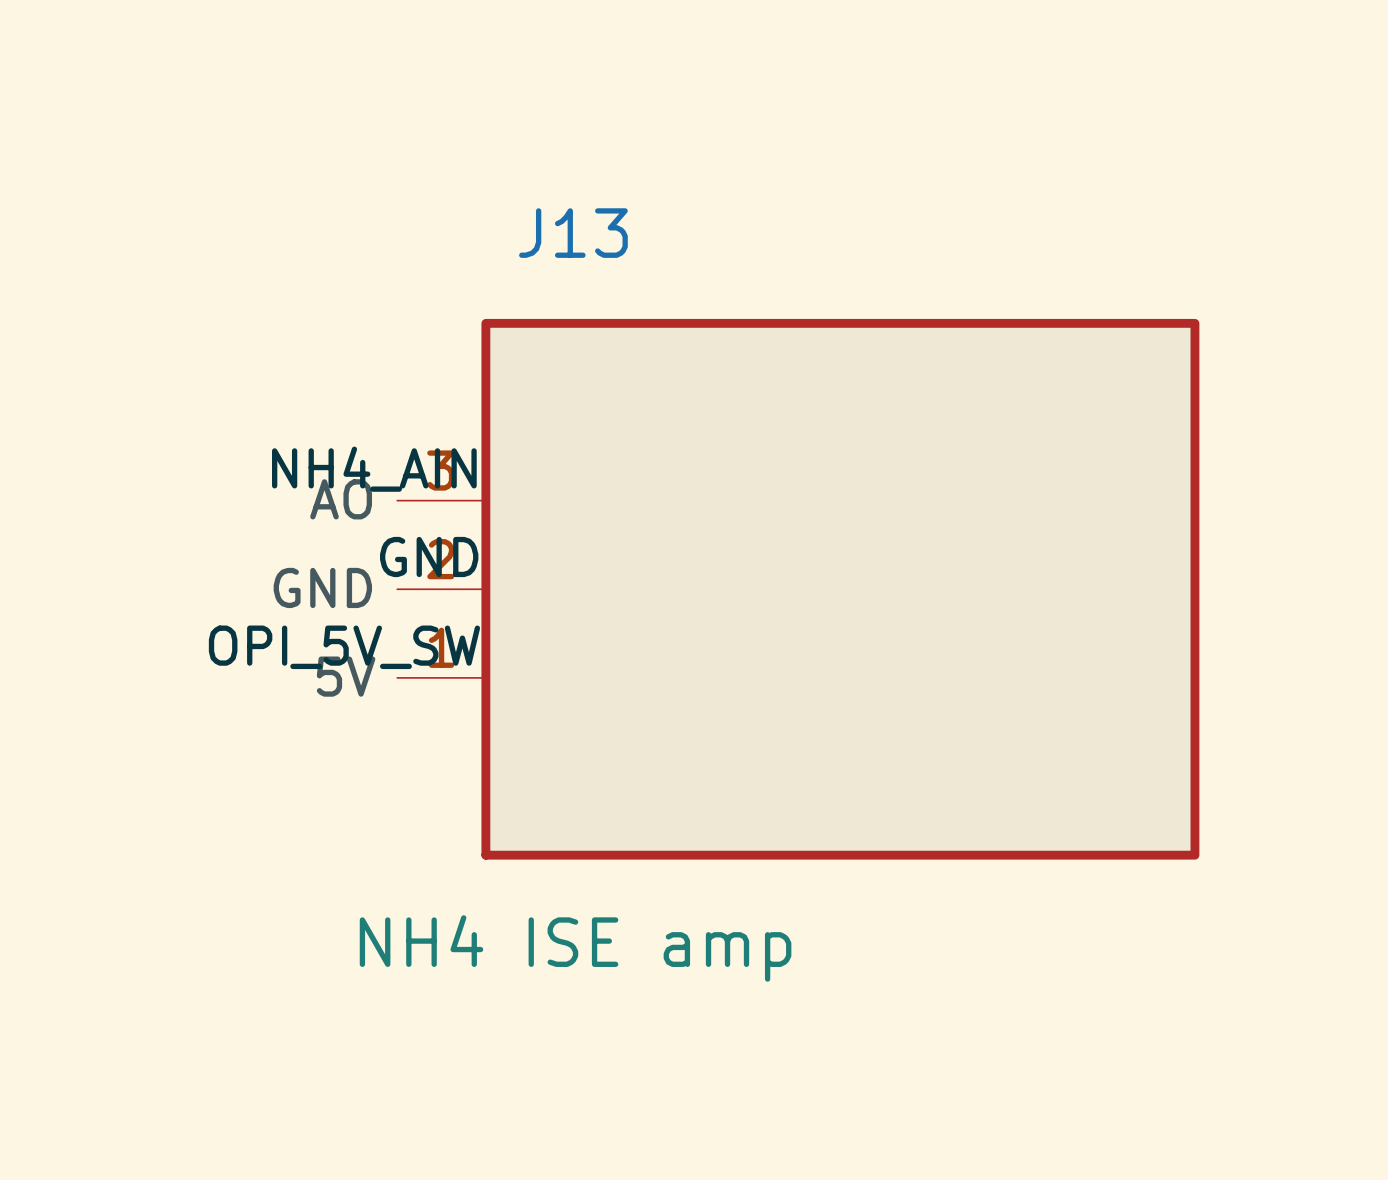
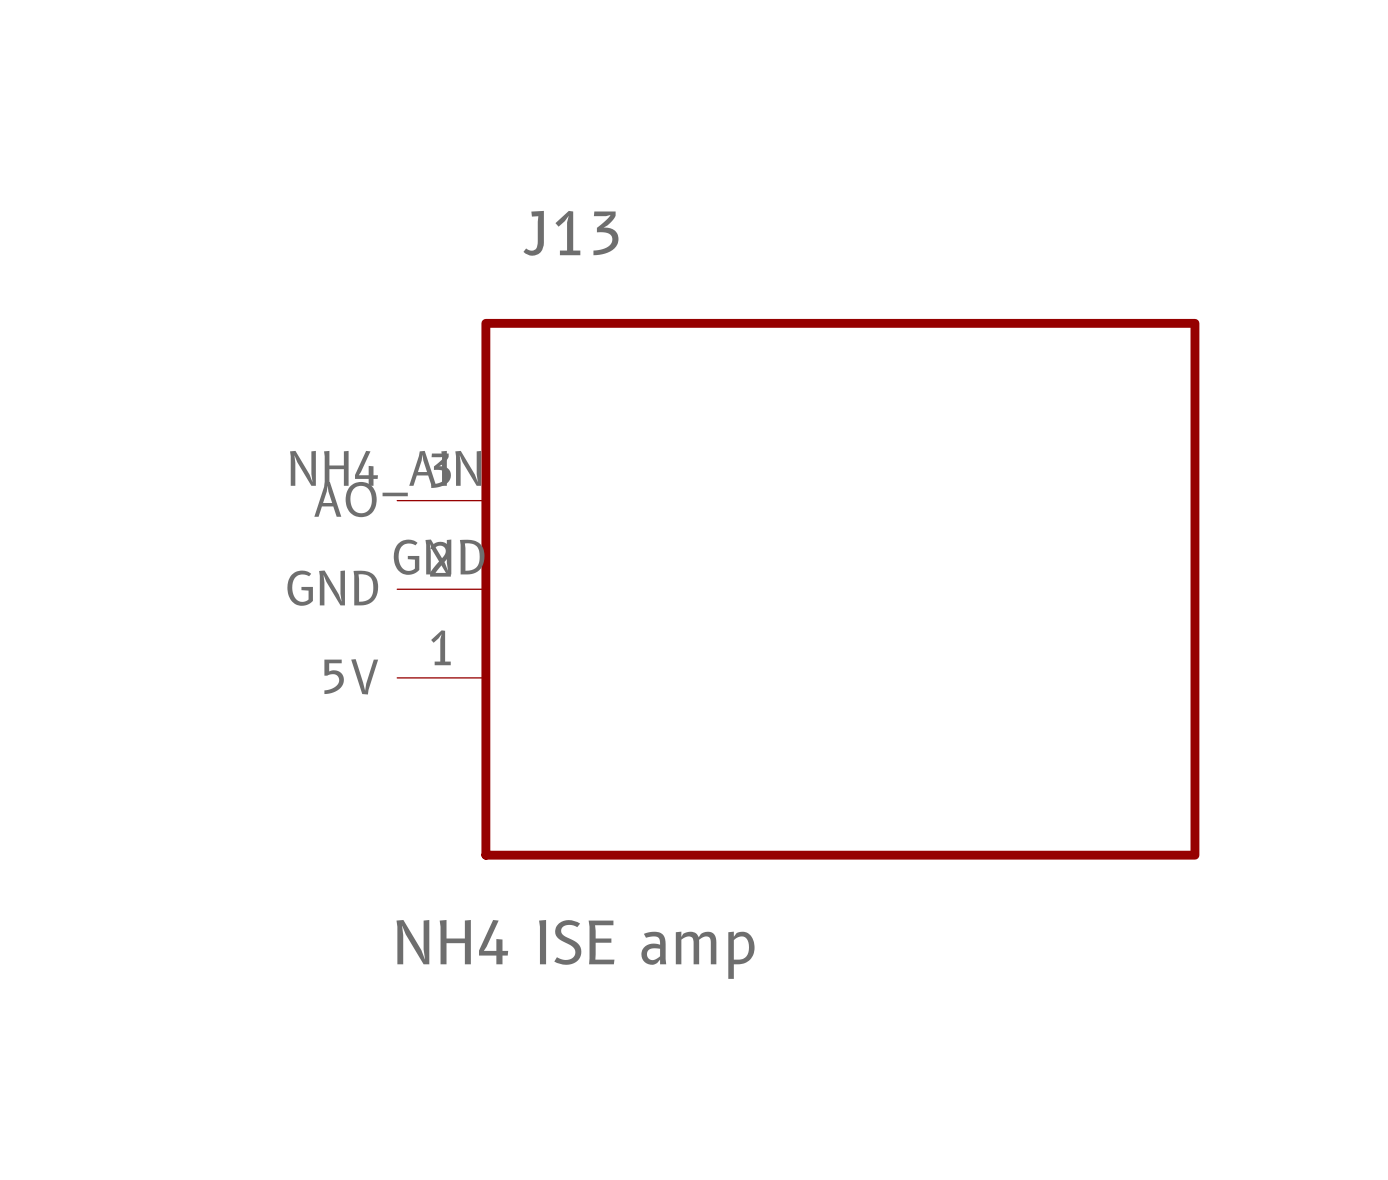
label: OPI_5V_SW (344, 647) -> none

